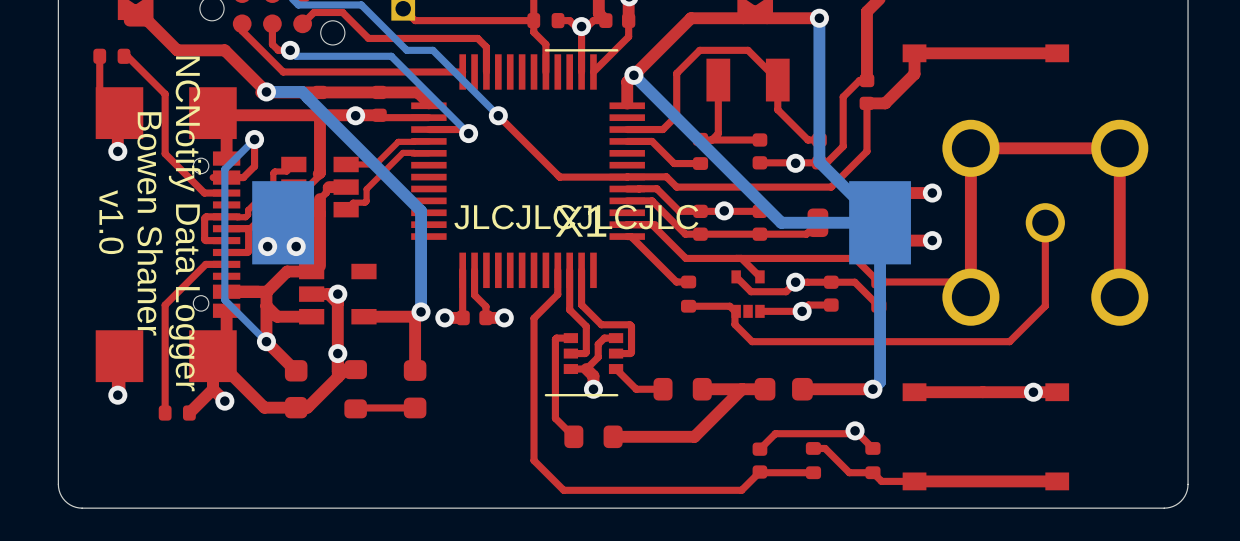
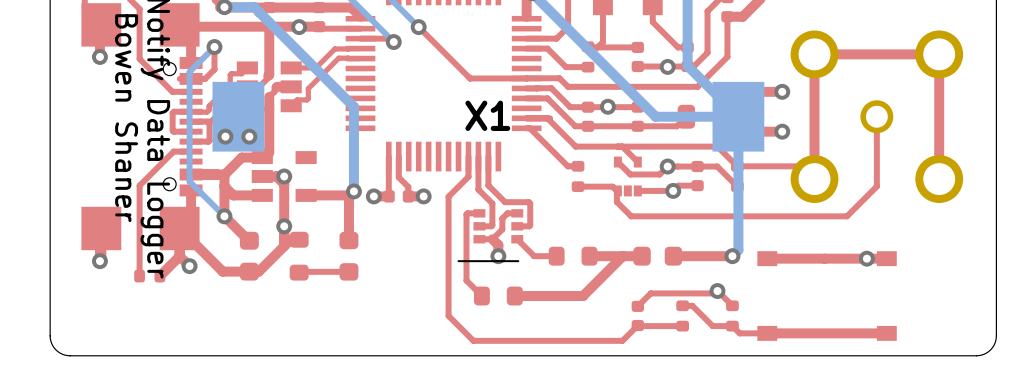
text: JLCJLCJLCJLC (576, 217) -> none
text: v1.0 (111, 222) -> none

